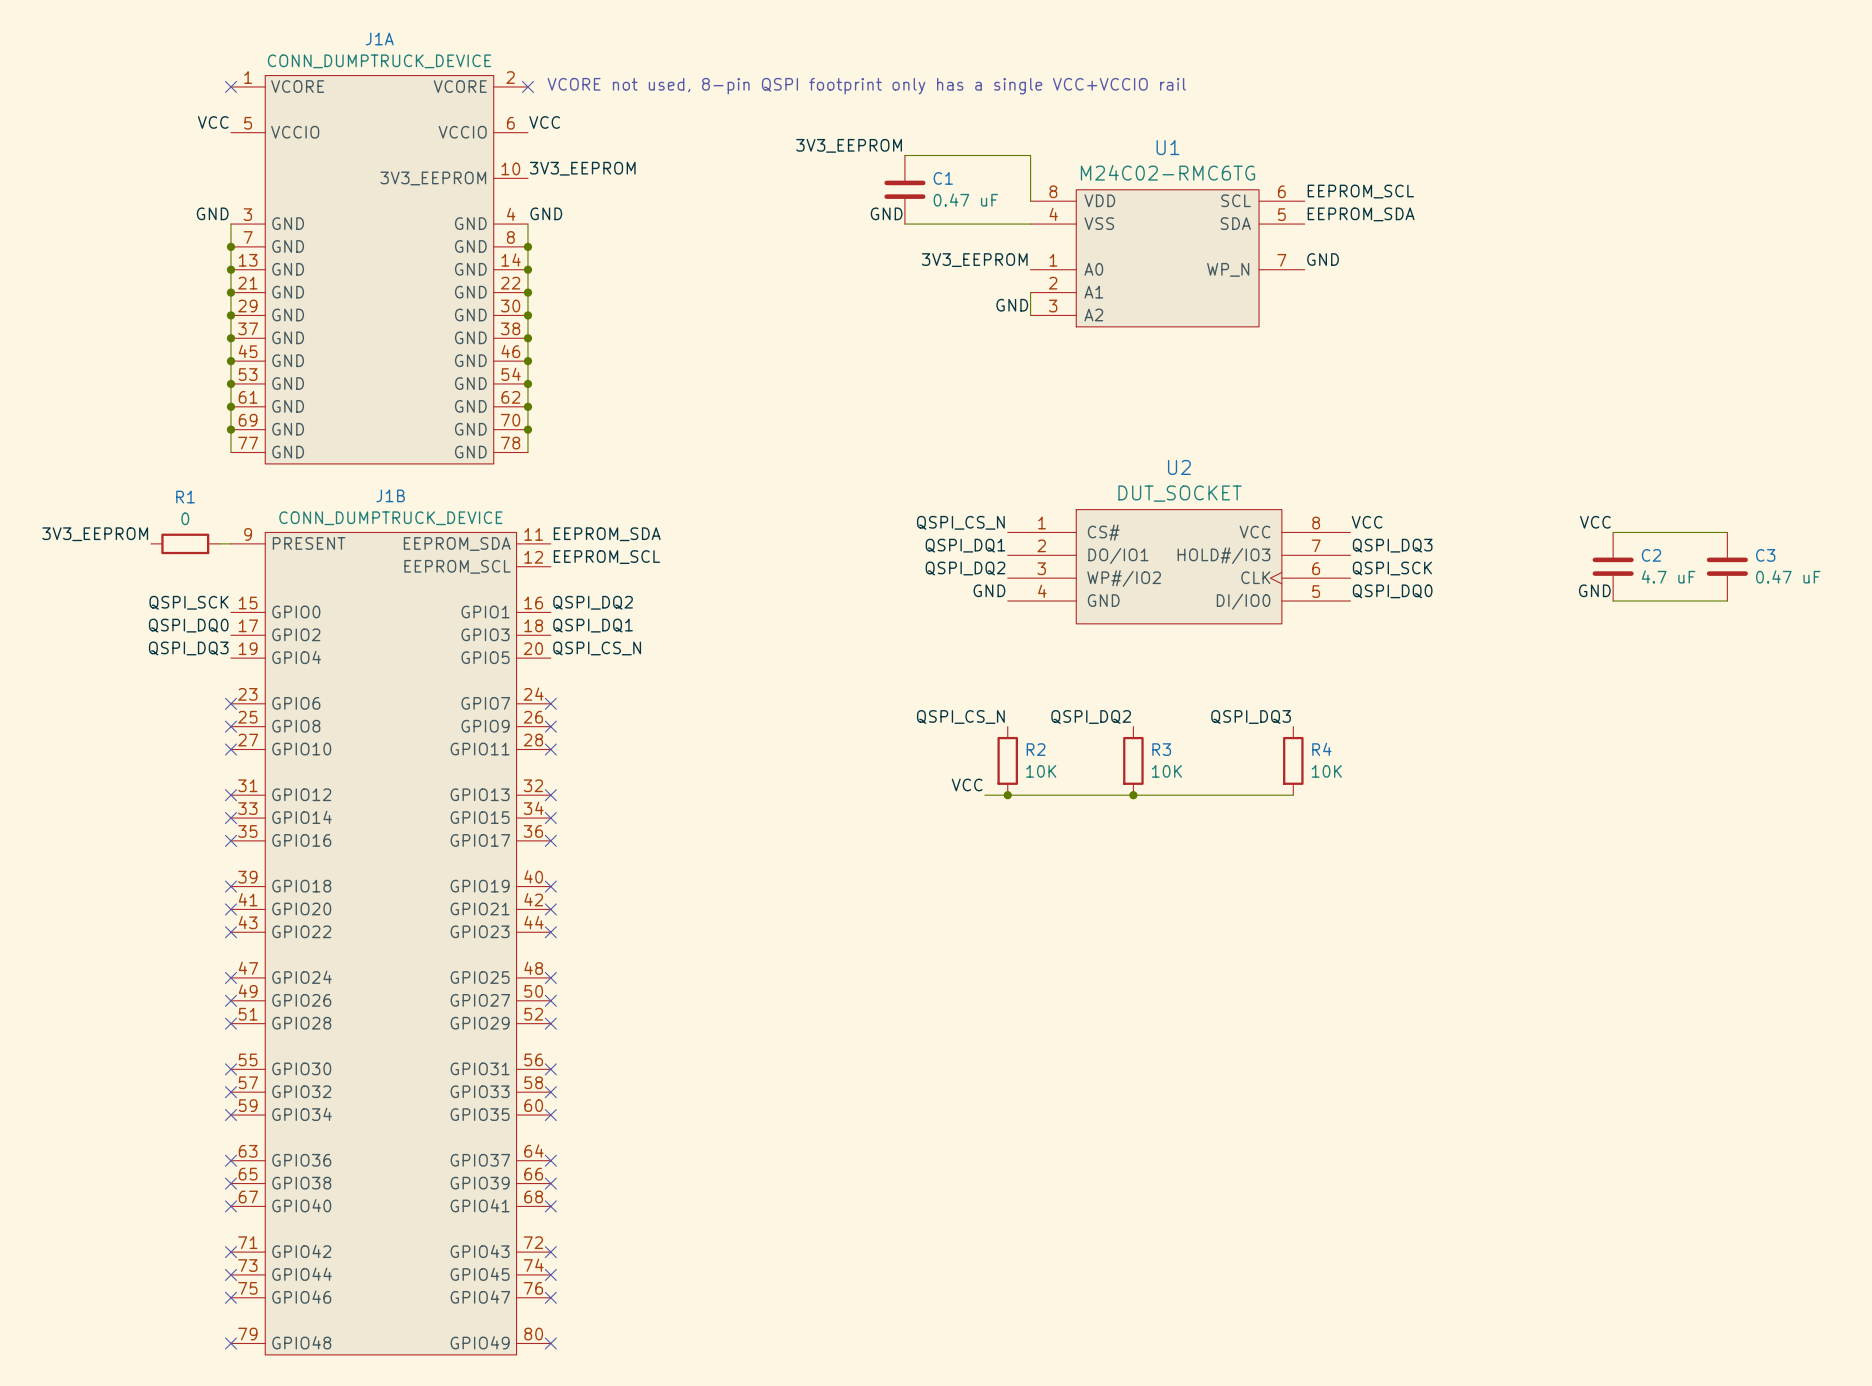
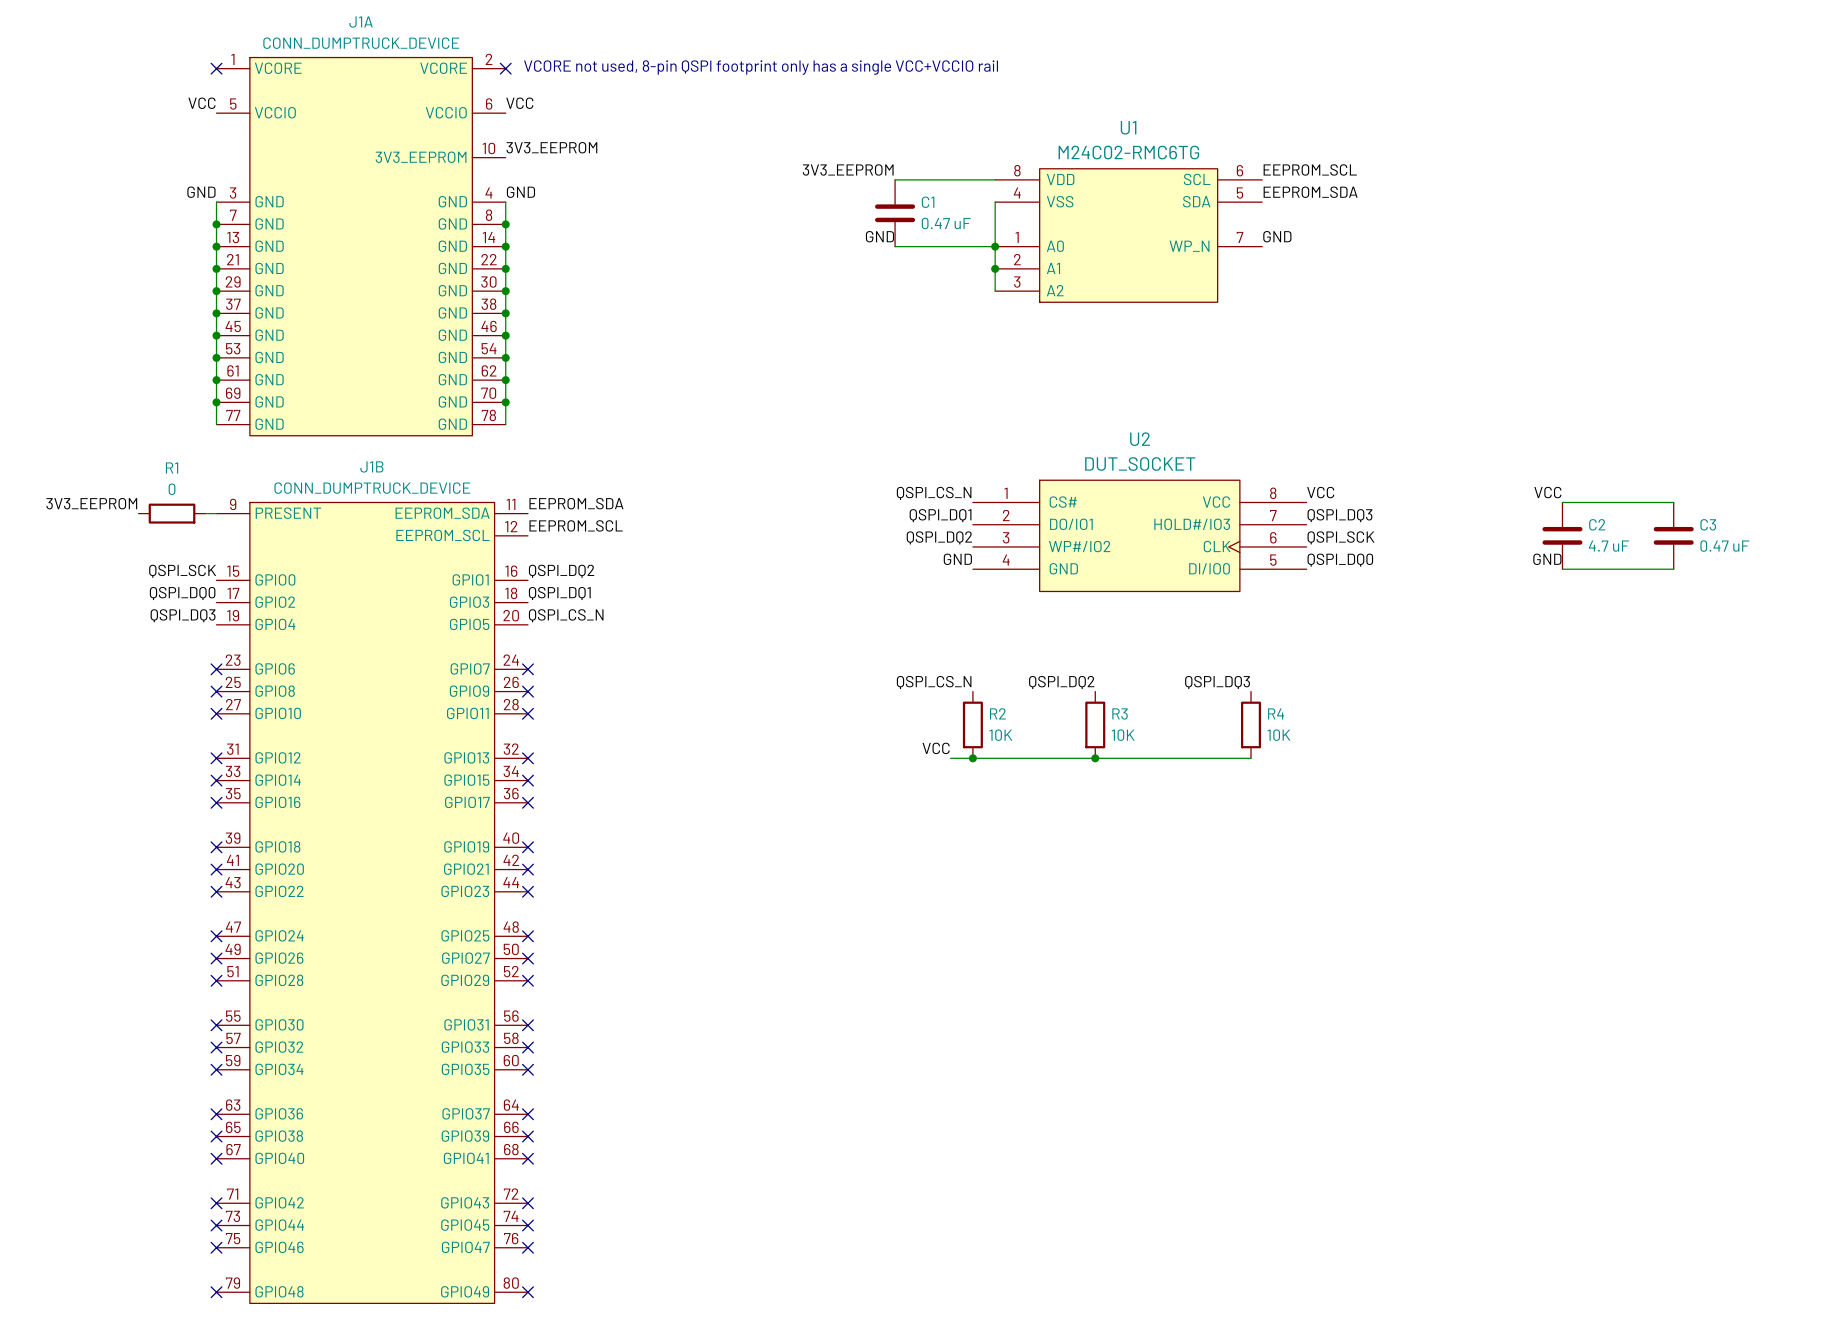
label position: 3V3_EEPROM (849, 145) -> 3V3_EEPROM (848, 169)
wire: (904, 155) (1030, 155) (1030, 201) -> (895, 179) (995, 179)
C1 position: (904, 189) -> (895, 213)
label position: GND (886, 213) -> GND (879, 236)
wire: (904, 224) (1030, 224) -> (995, 268) (995, 202)
label: 3V3_EEPROM (974, 260) -> none
wire: none -> (895, 246) (995, 246)
junction: none -> (995, 246)
junction: none -> (995, 268)
label: GND (1012, 305) -> none

